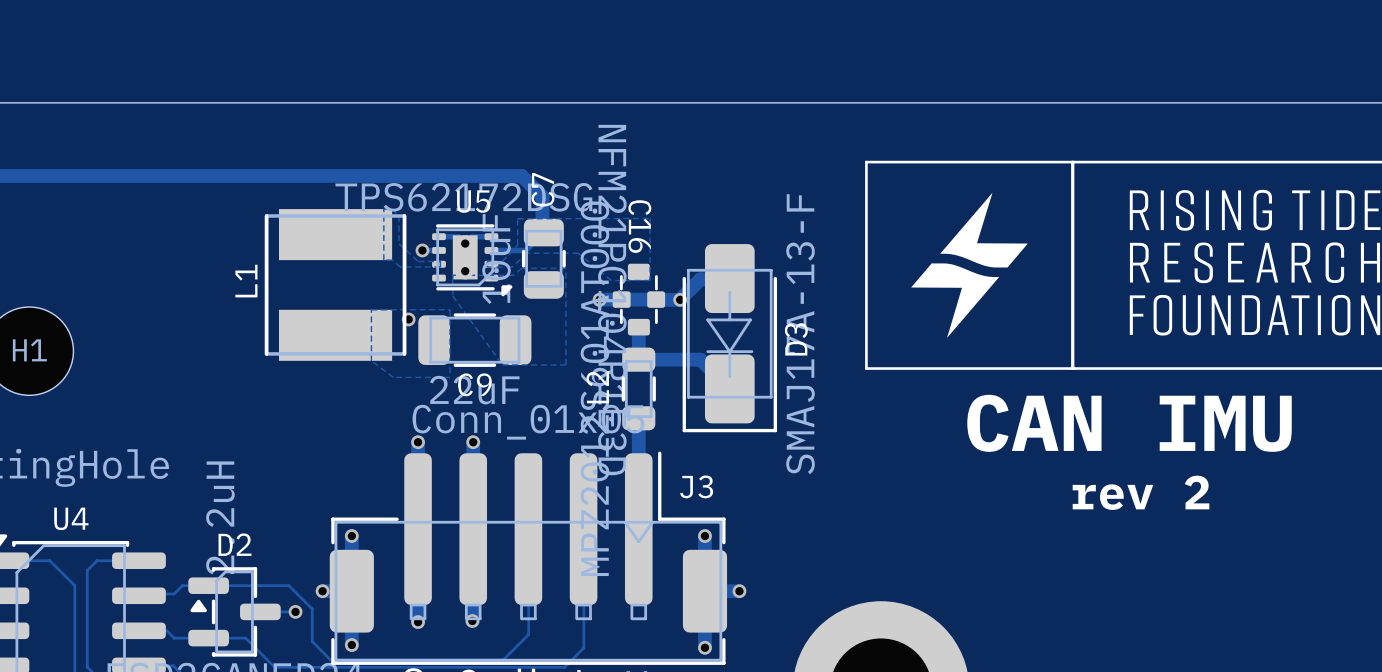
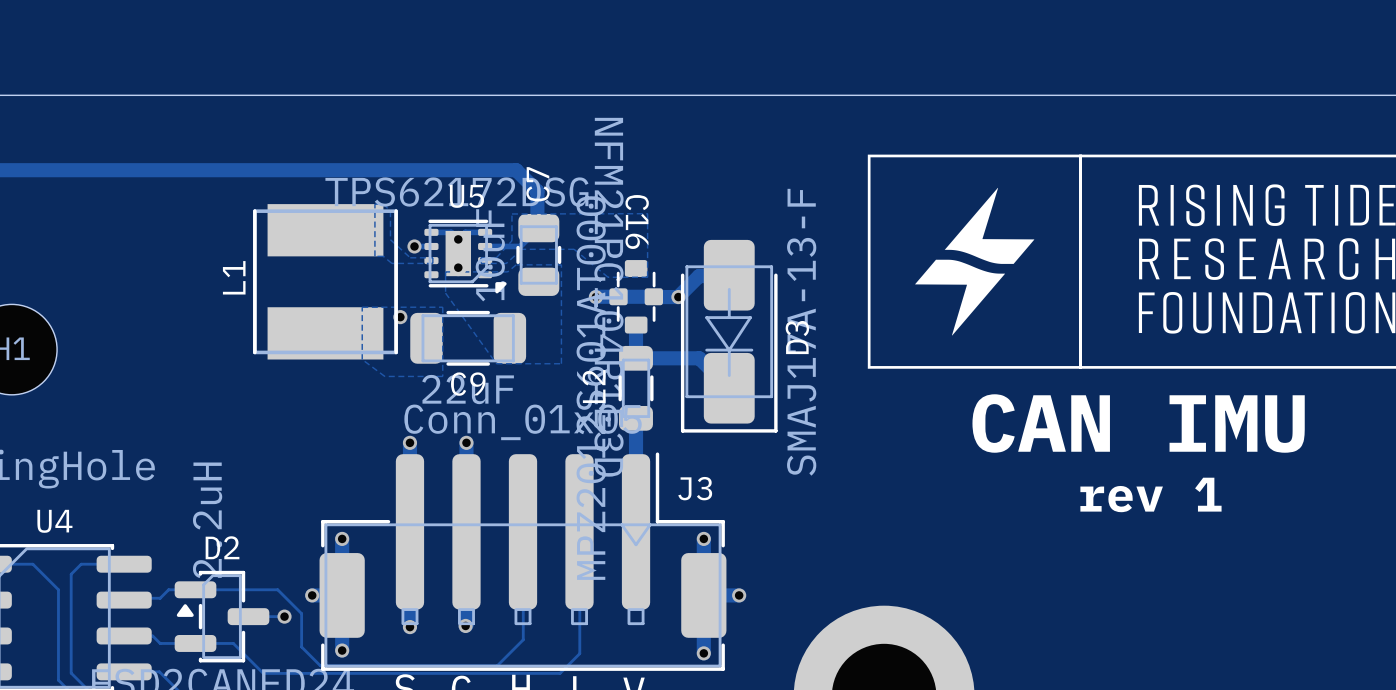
text: rev 2 (1141, 492) -> rev 1 (1150, 494)

